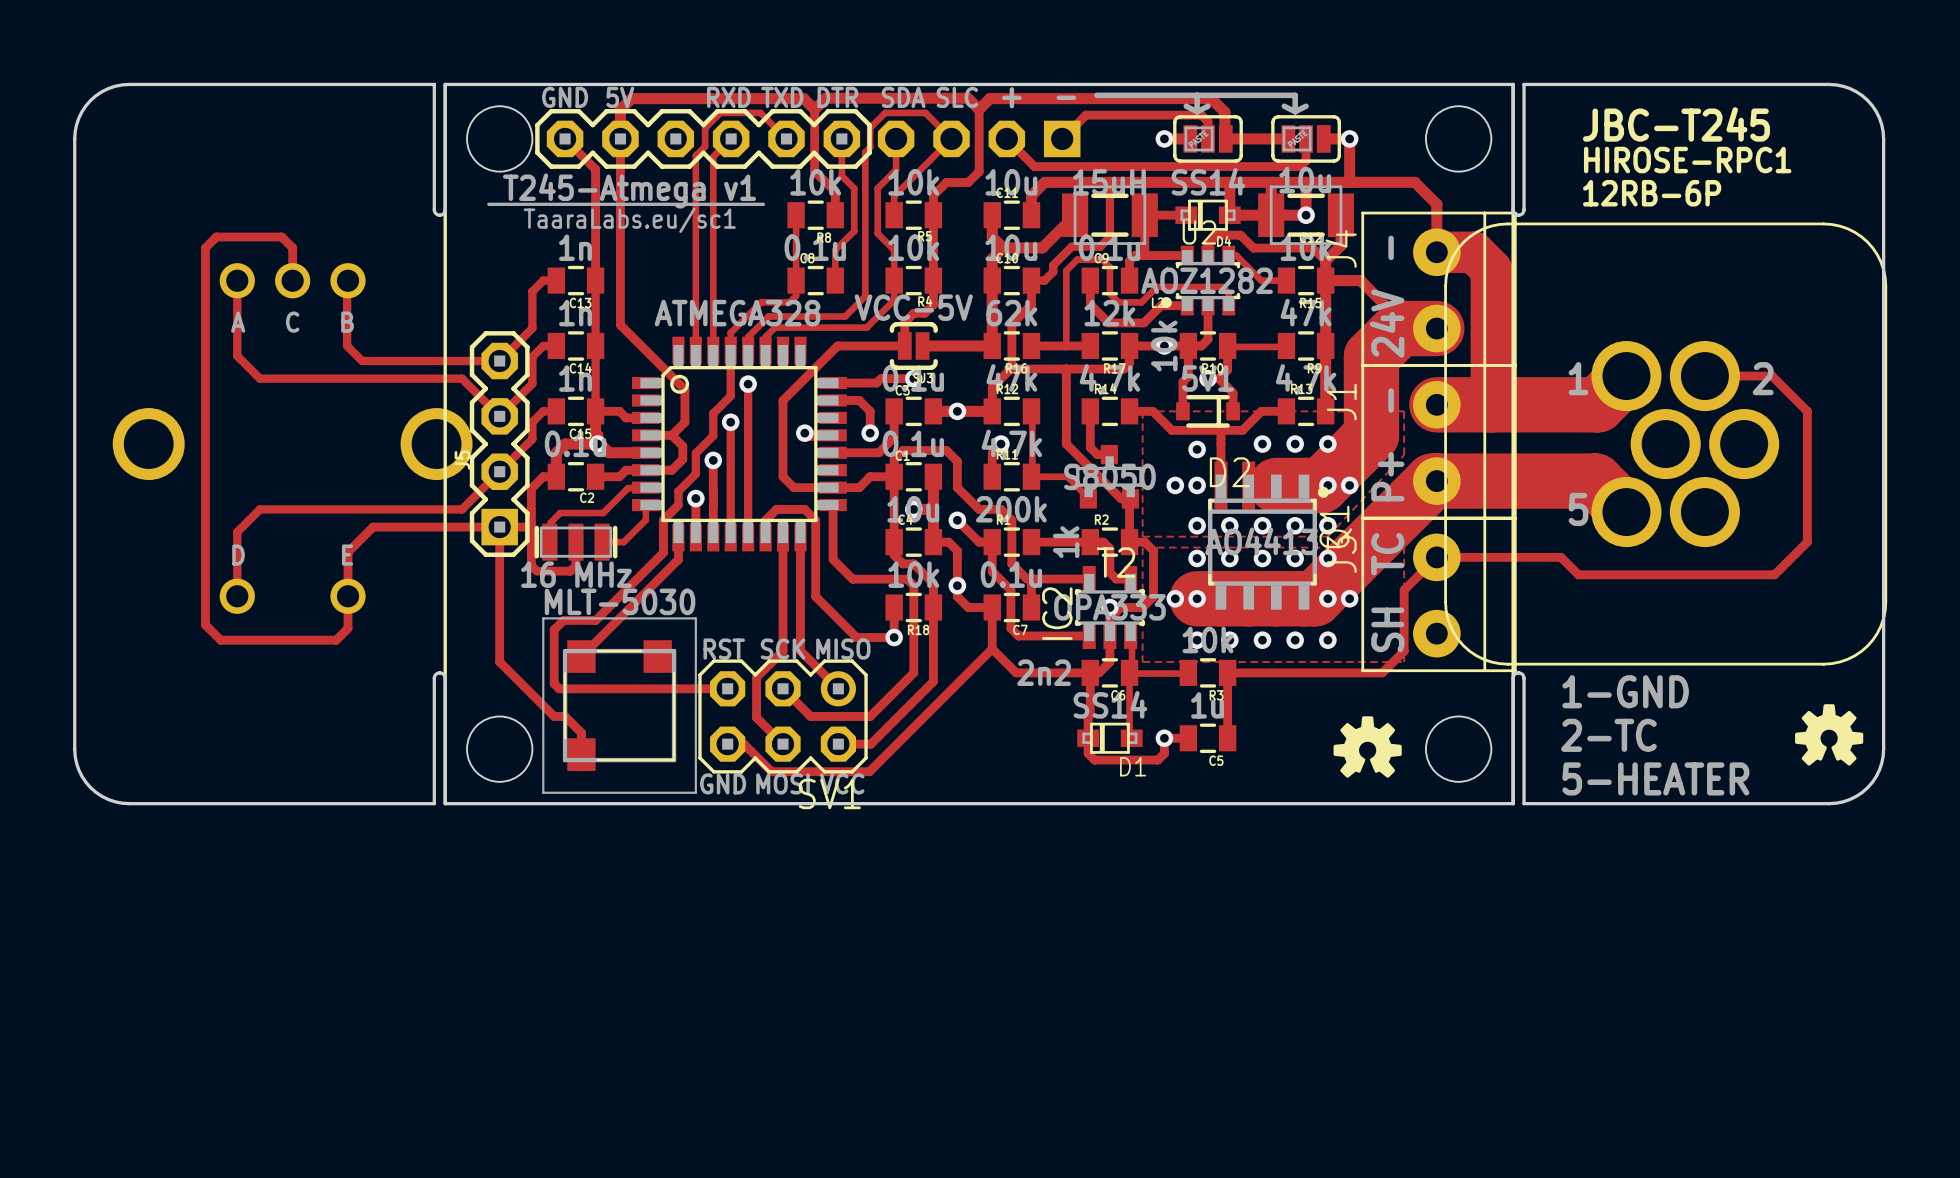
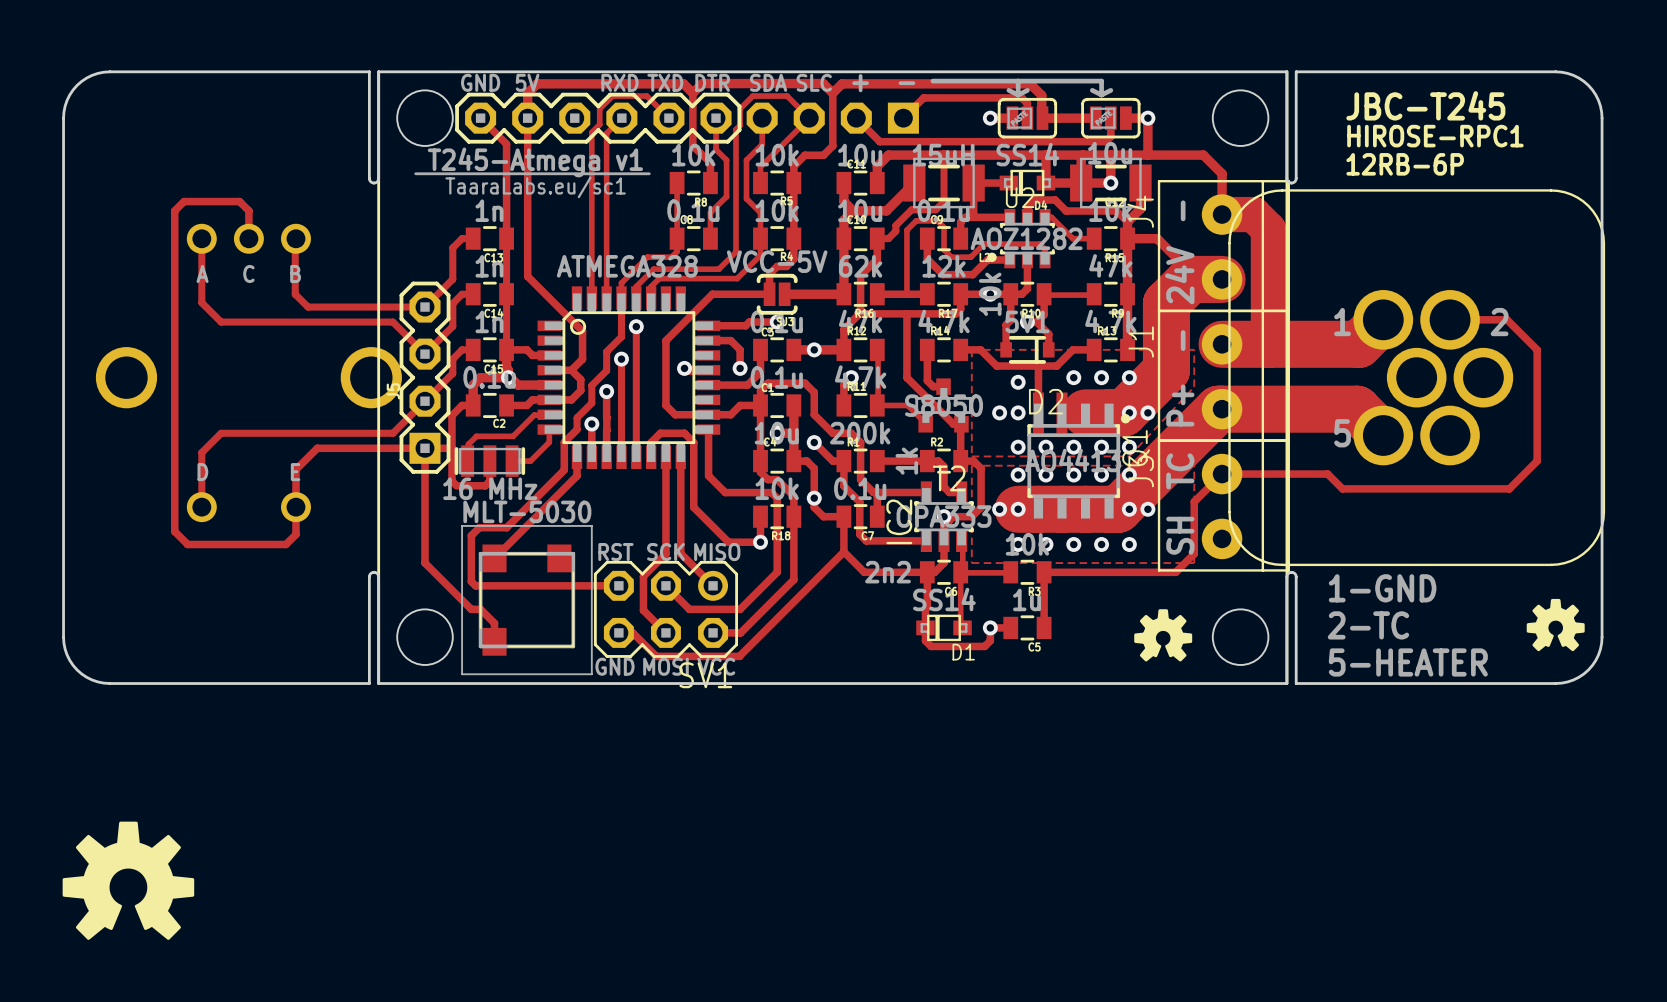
drawing: none -> [62, 821, 195, 940]

